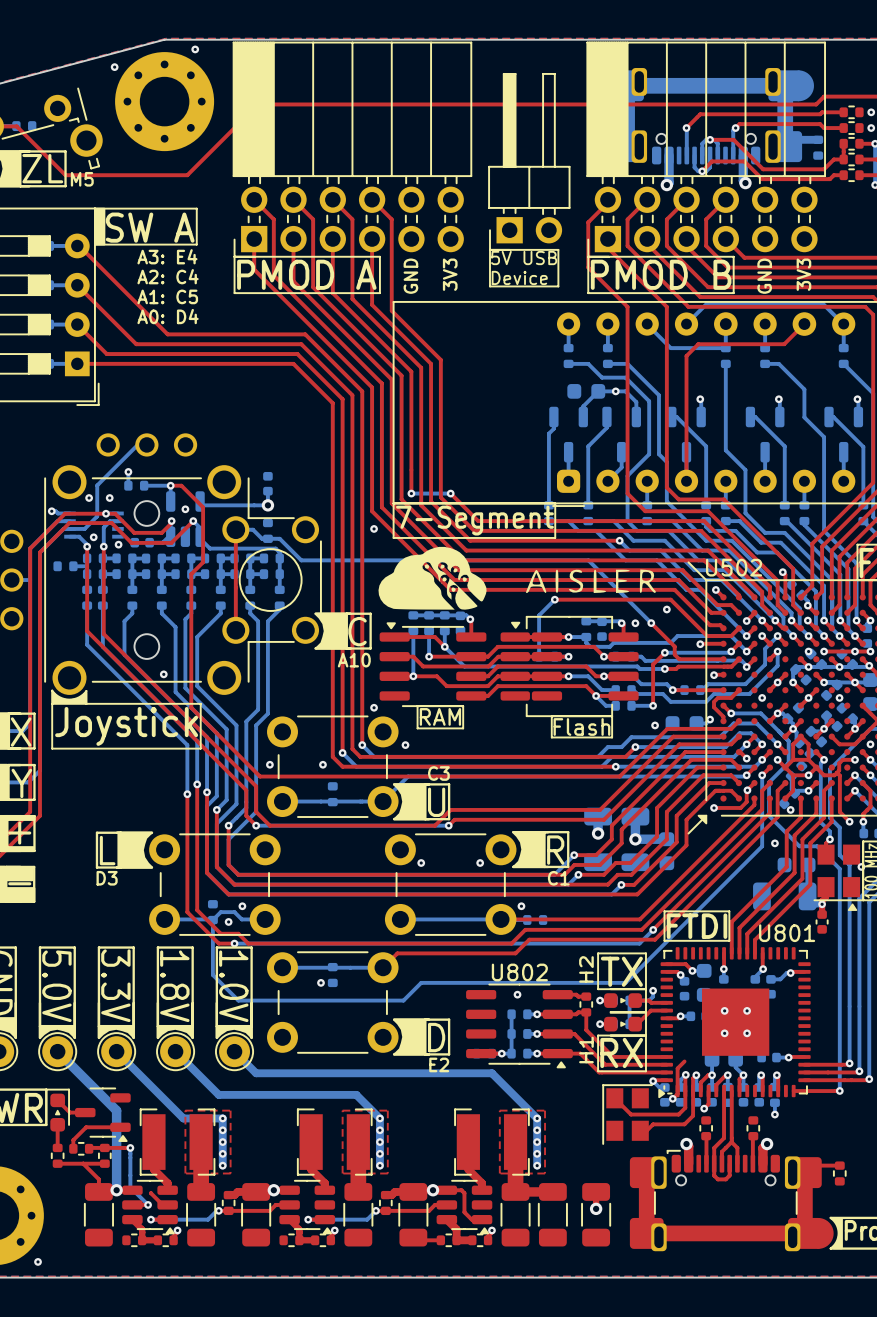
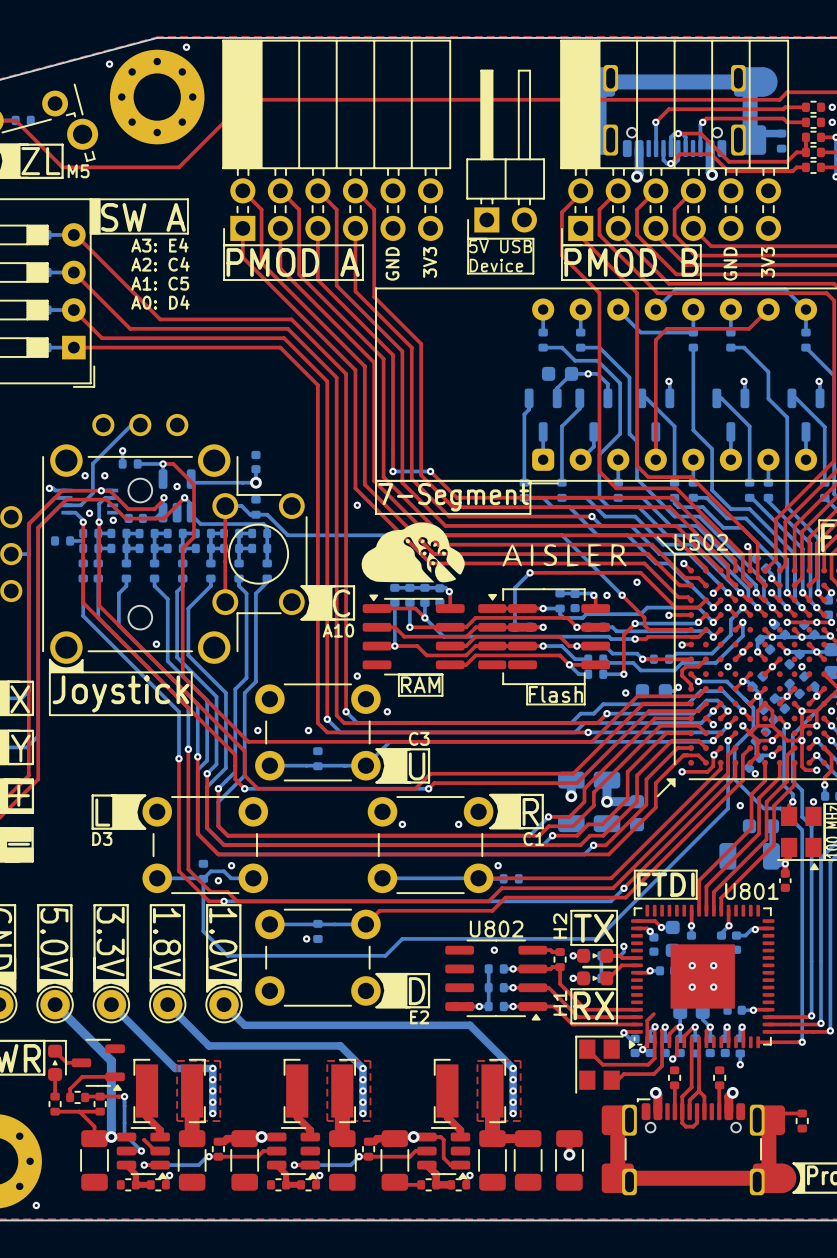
top track: none -> (801, 711) (801, 766) (805, 770) (816, 769)
via: none -> (801, 711)
top track: none -> (816, 711) (816, 725)
top track: (837, 772) (839, 775) (839, 812) (849, 821) -> none
via: none -> (801, 740)
via: none -> (816, 770)
via: (849, 821) -> none
via: none -> (813, 801)
via: (861, 866) -> none

